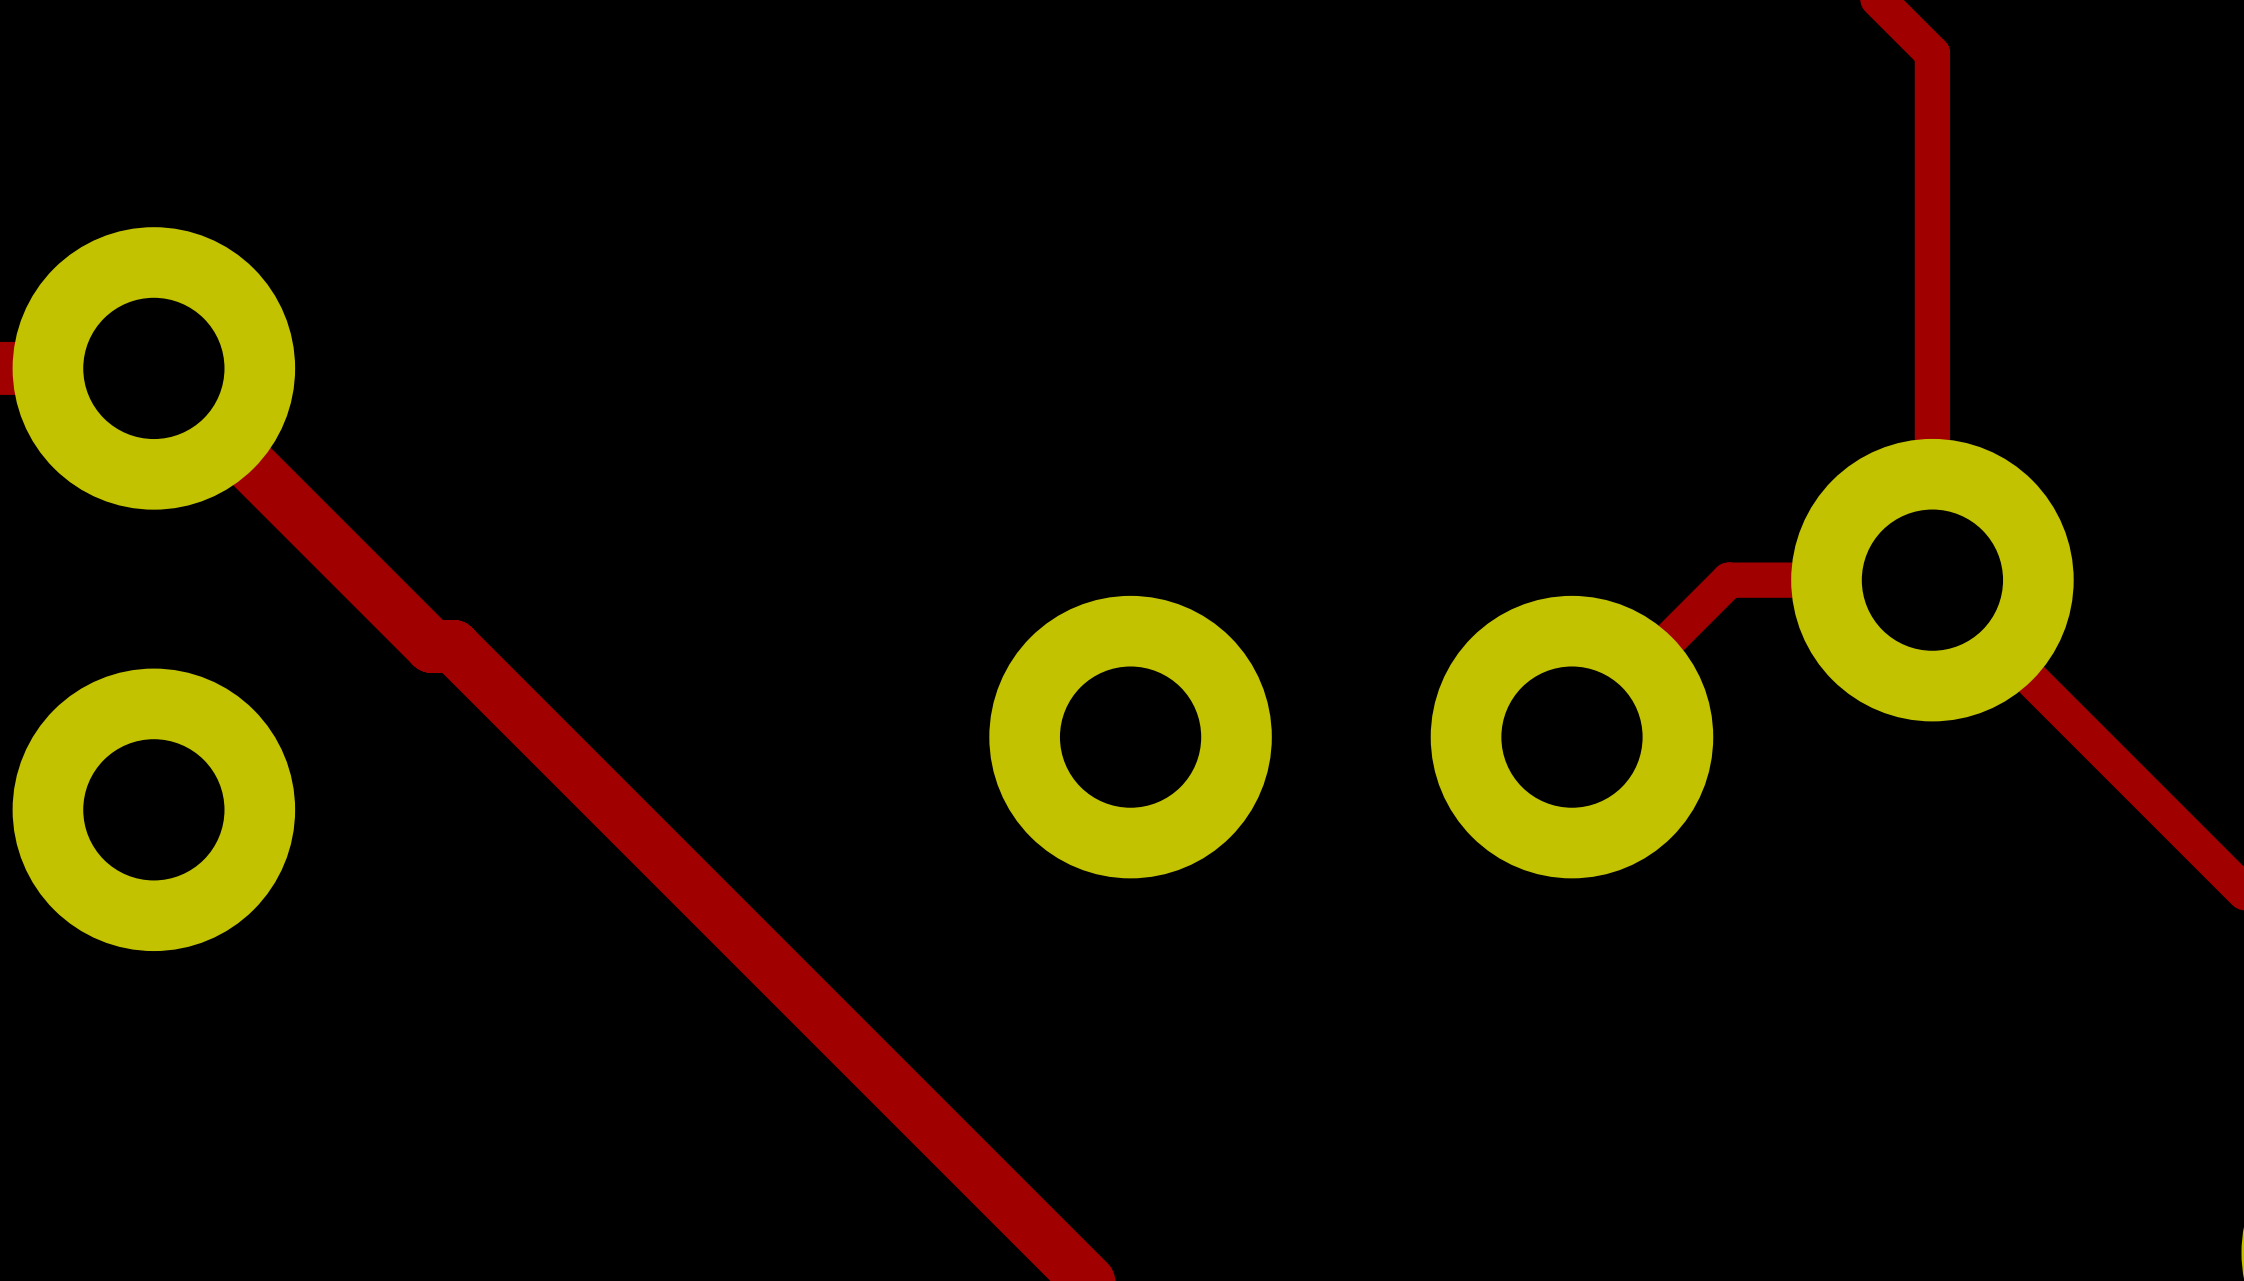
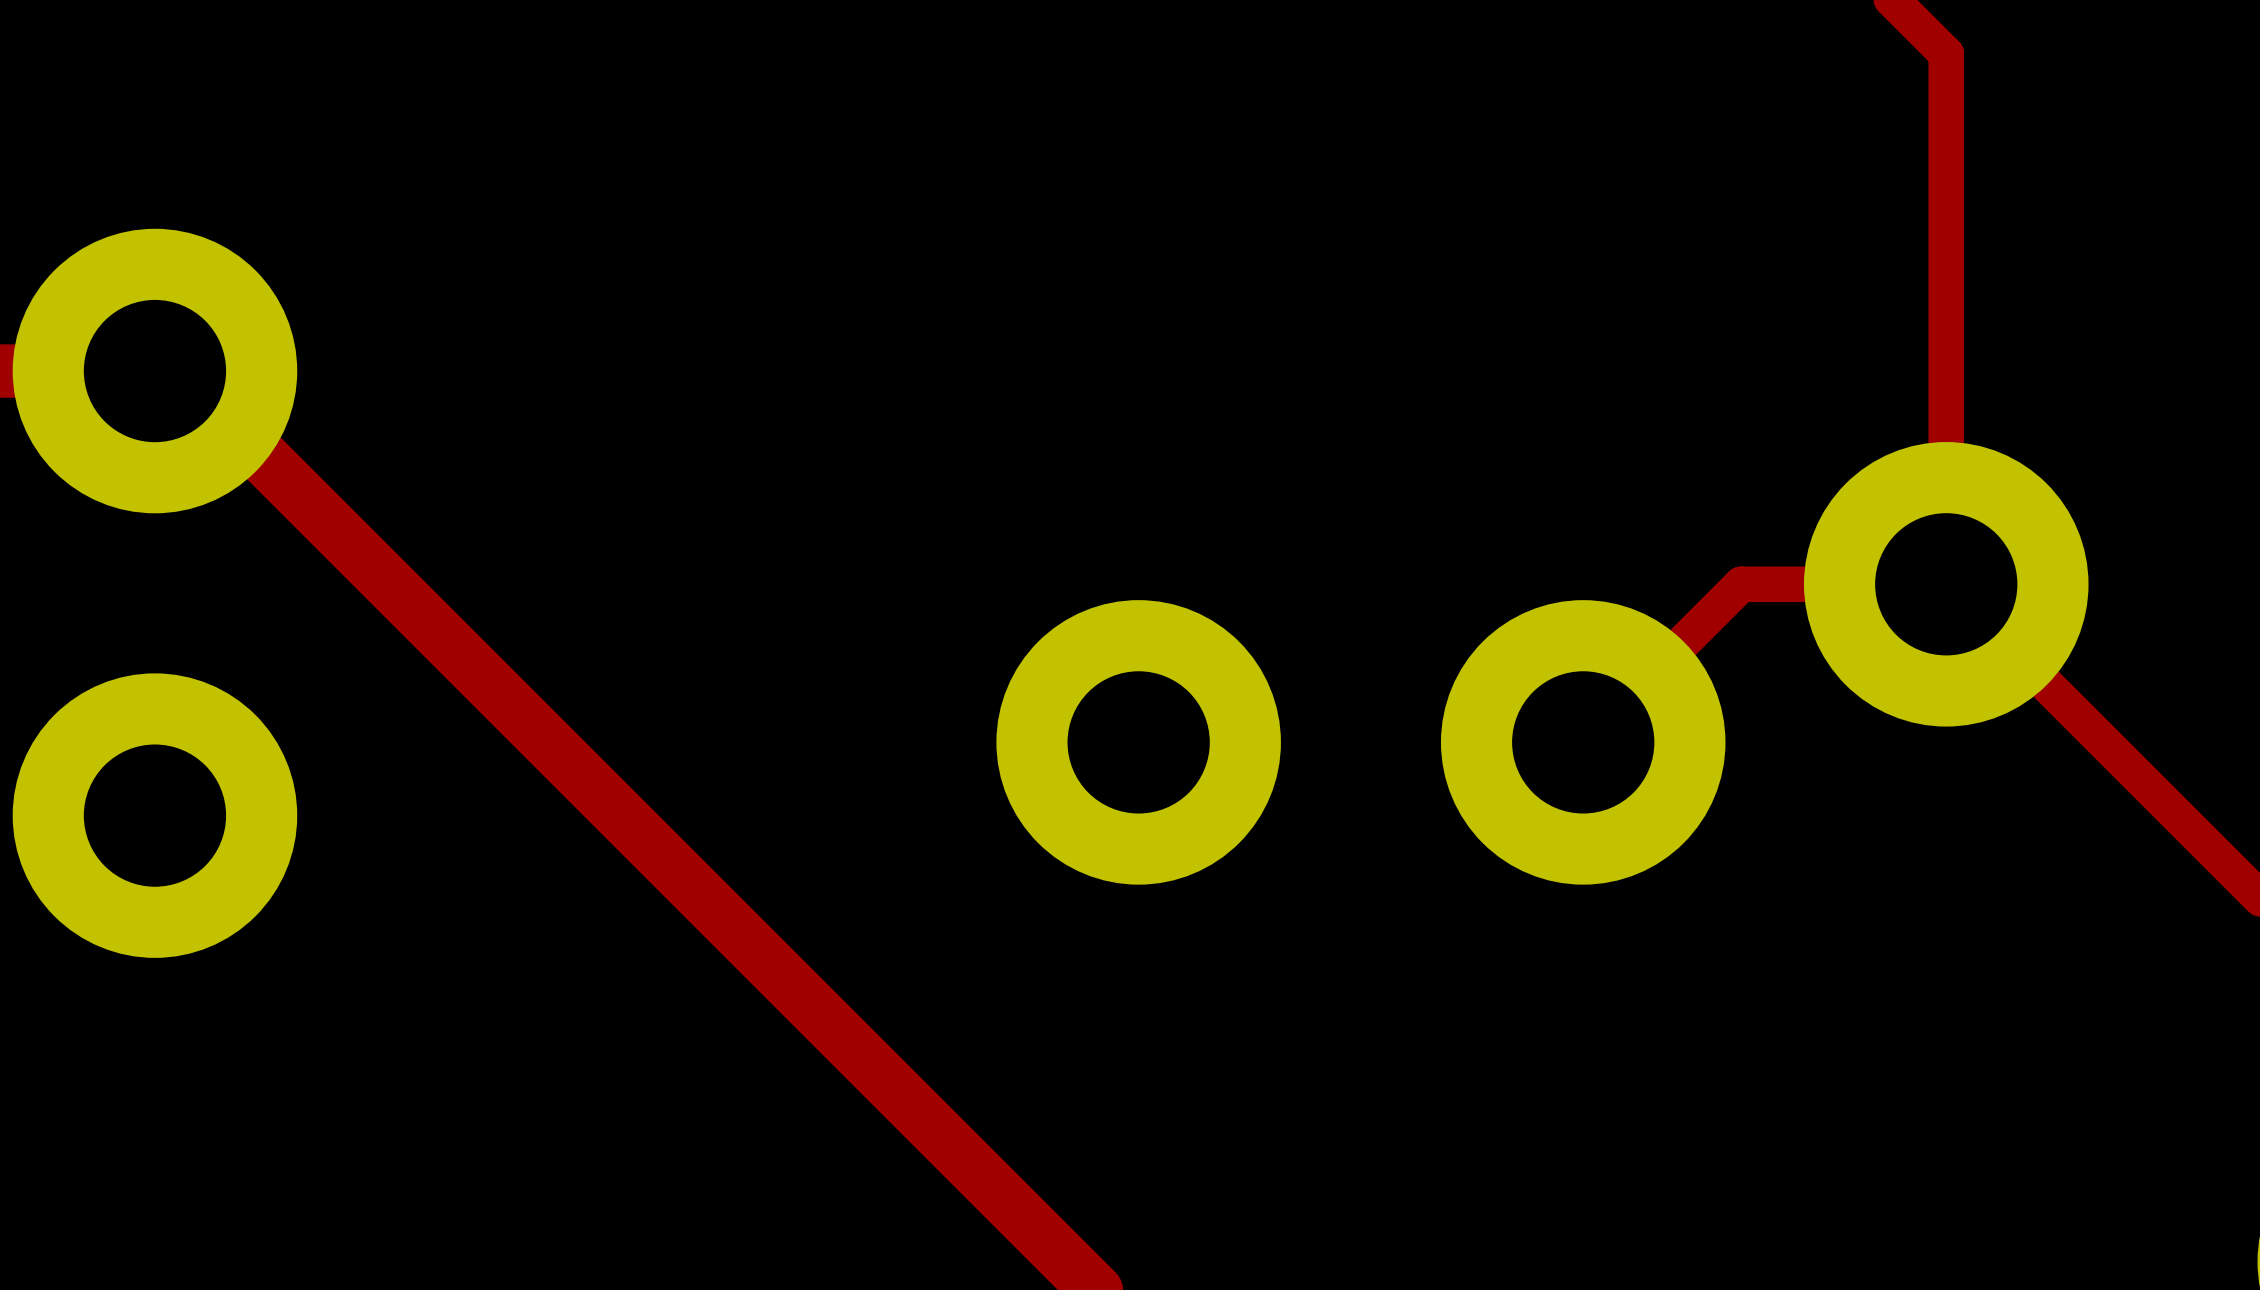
top track: (153, 368) (431, 646) (453, 646) -> (154, 371) (176, 371) (456, 651)

